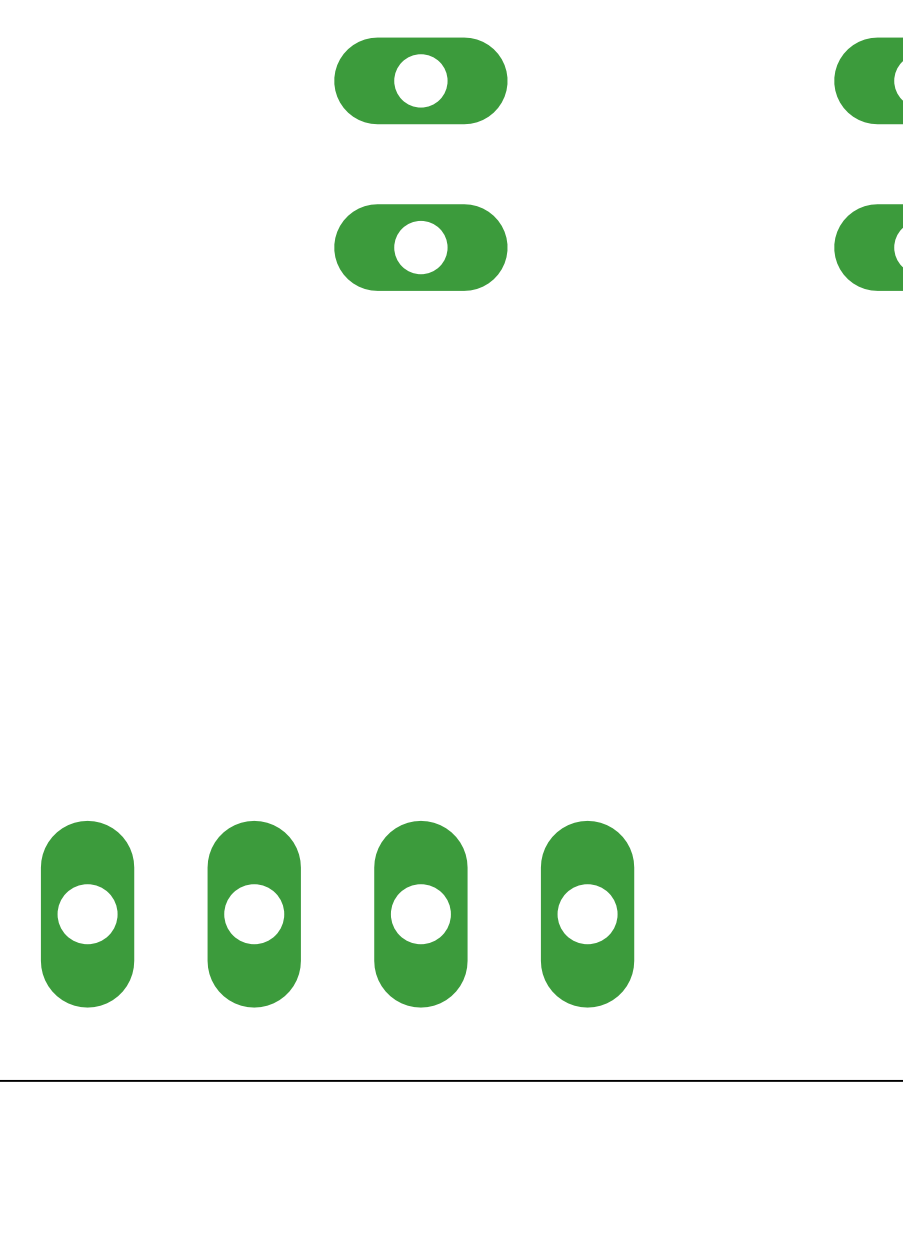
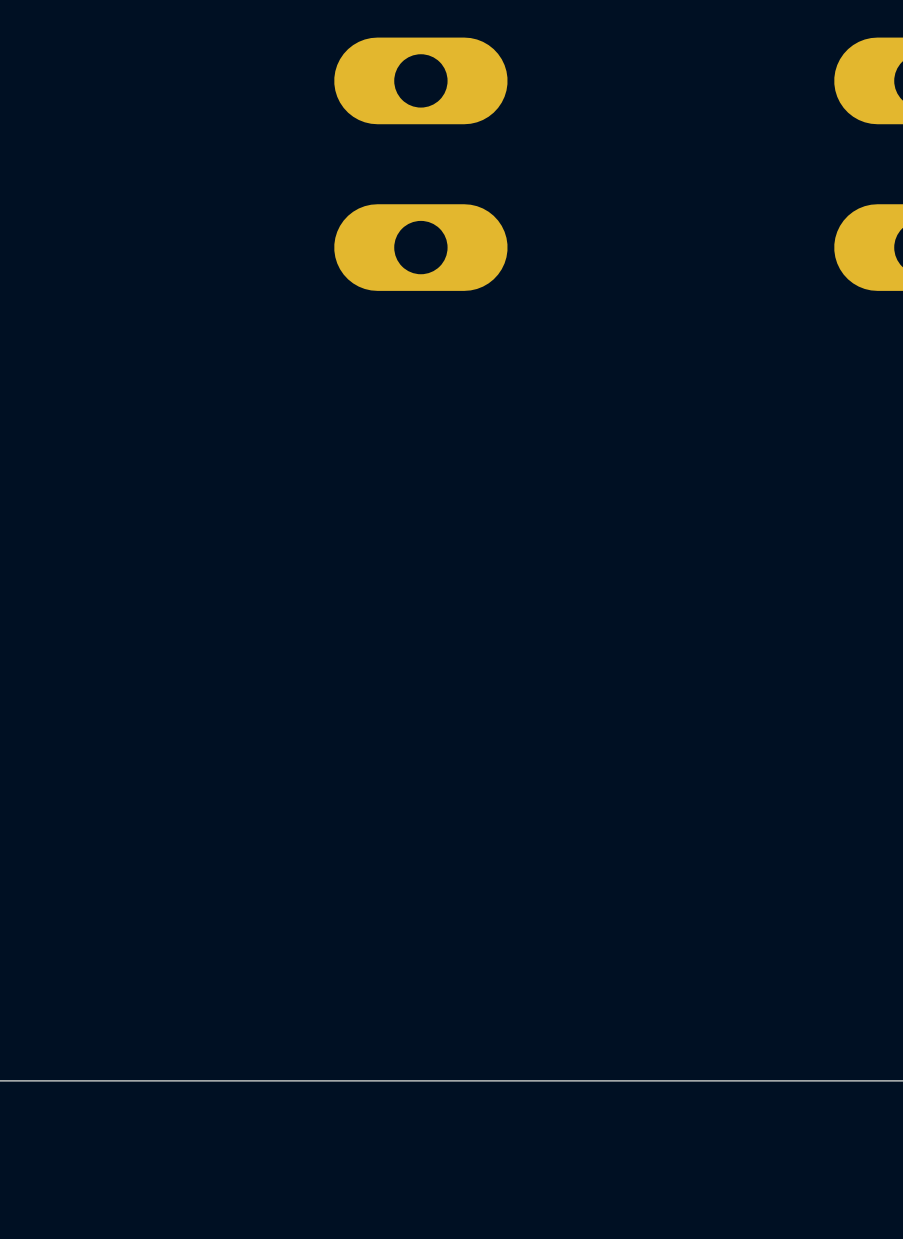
part: (337, 914) -> none

